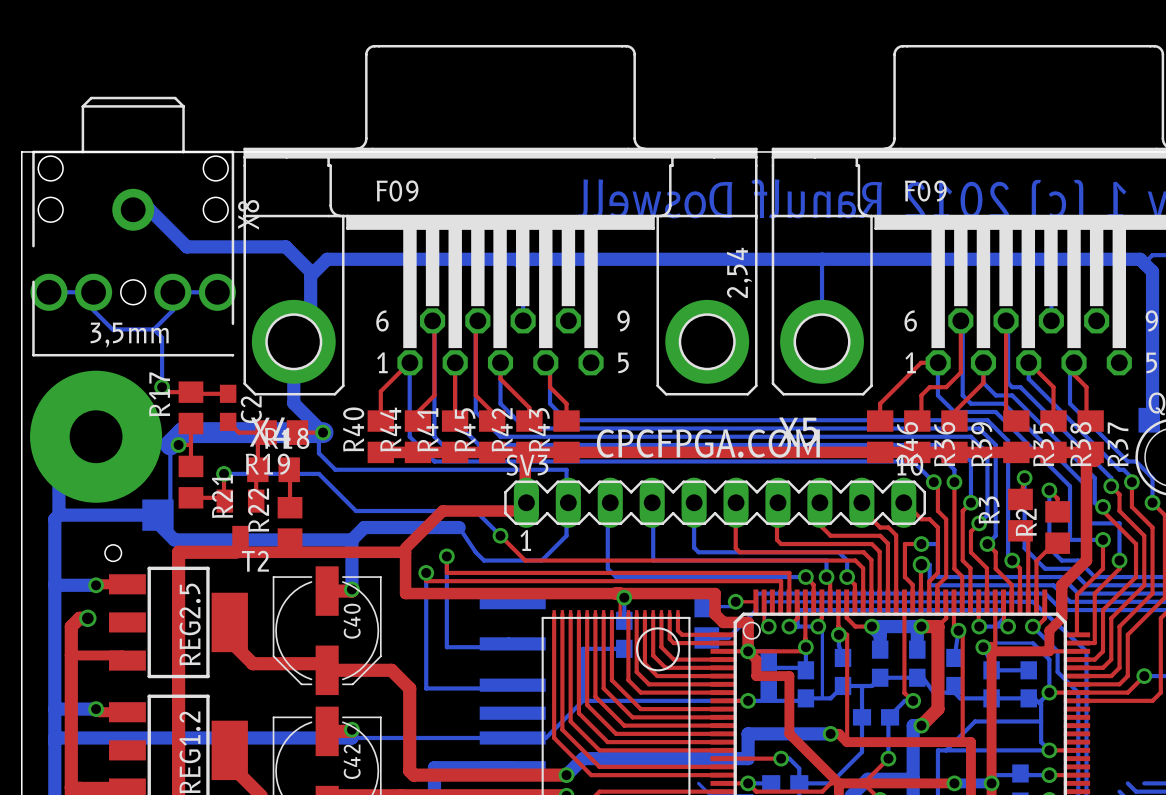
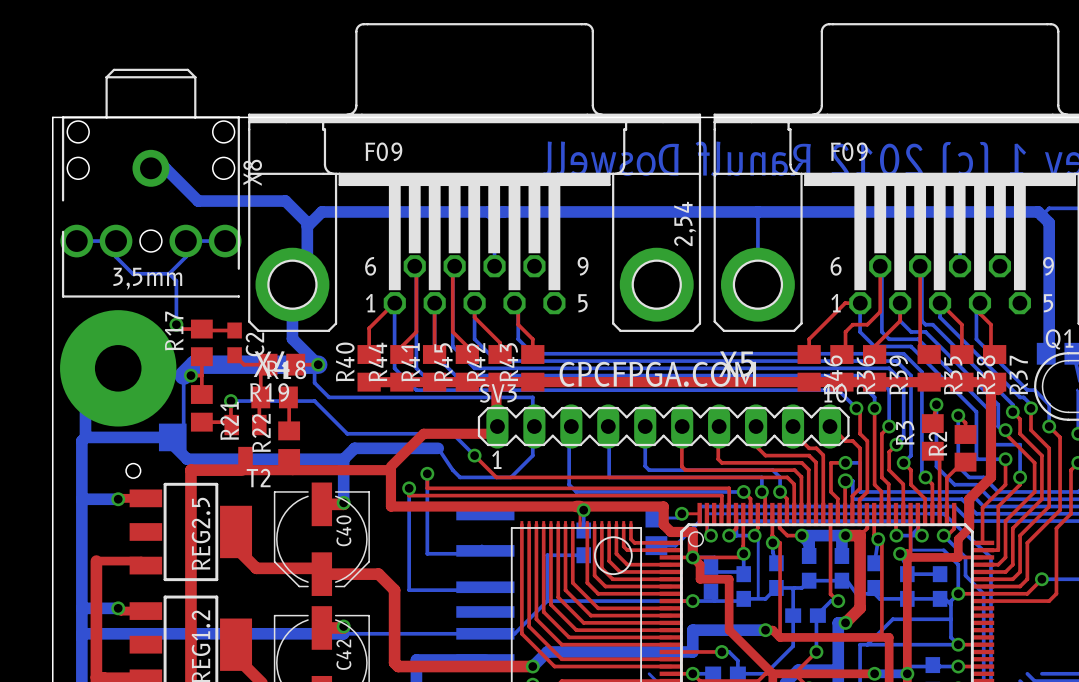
top track: (87, 618) (79, 618) (71, 626) (71, 655) -> none
via: (87, 618) -> none

